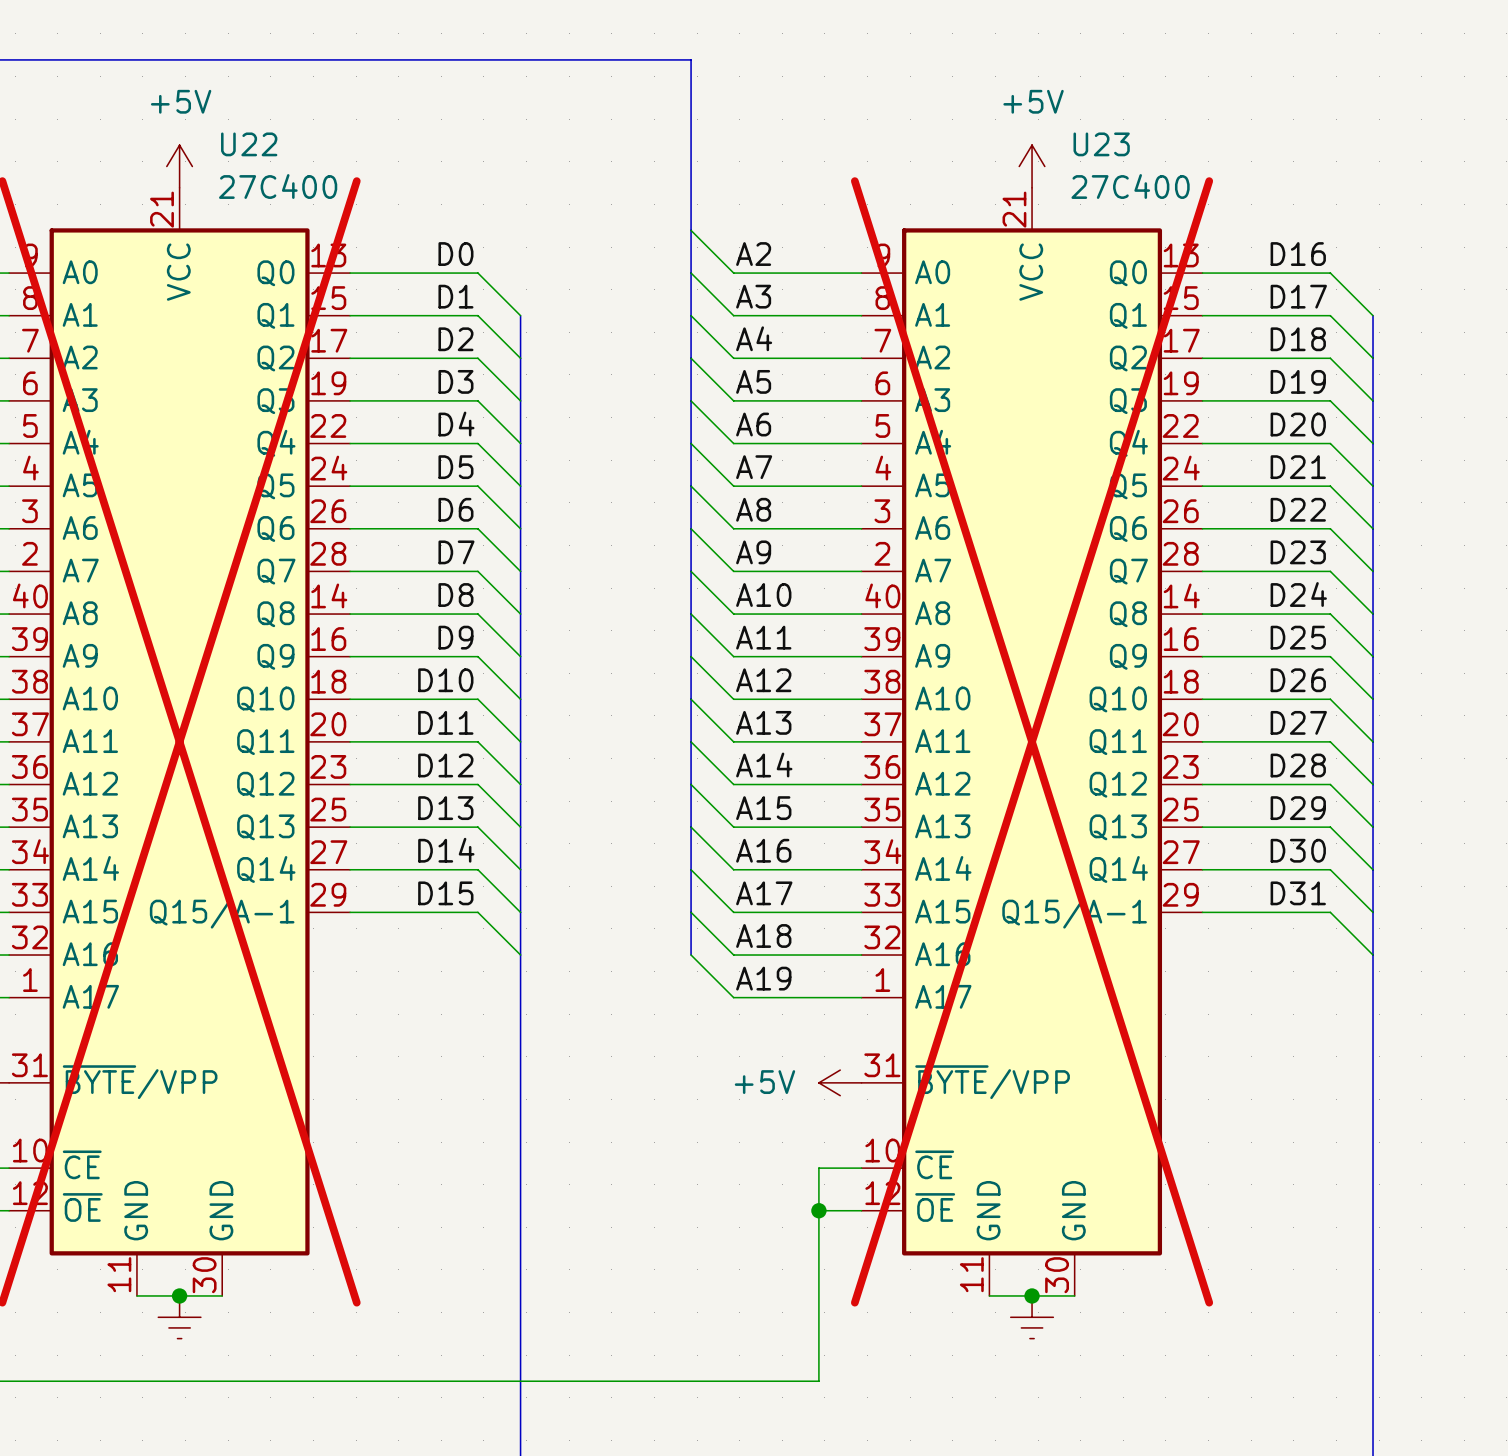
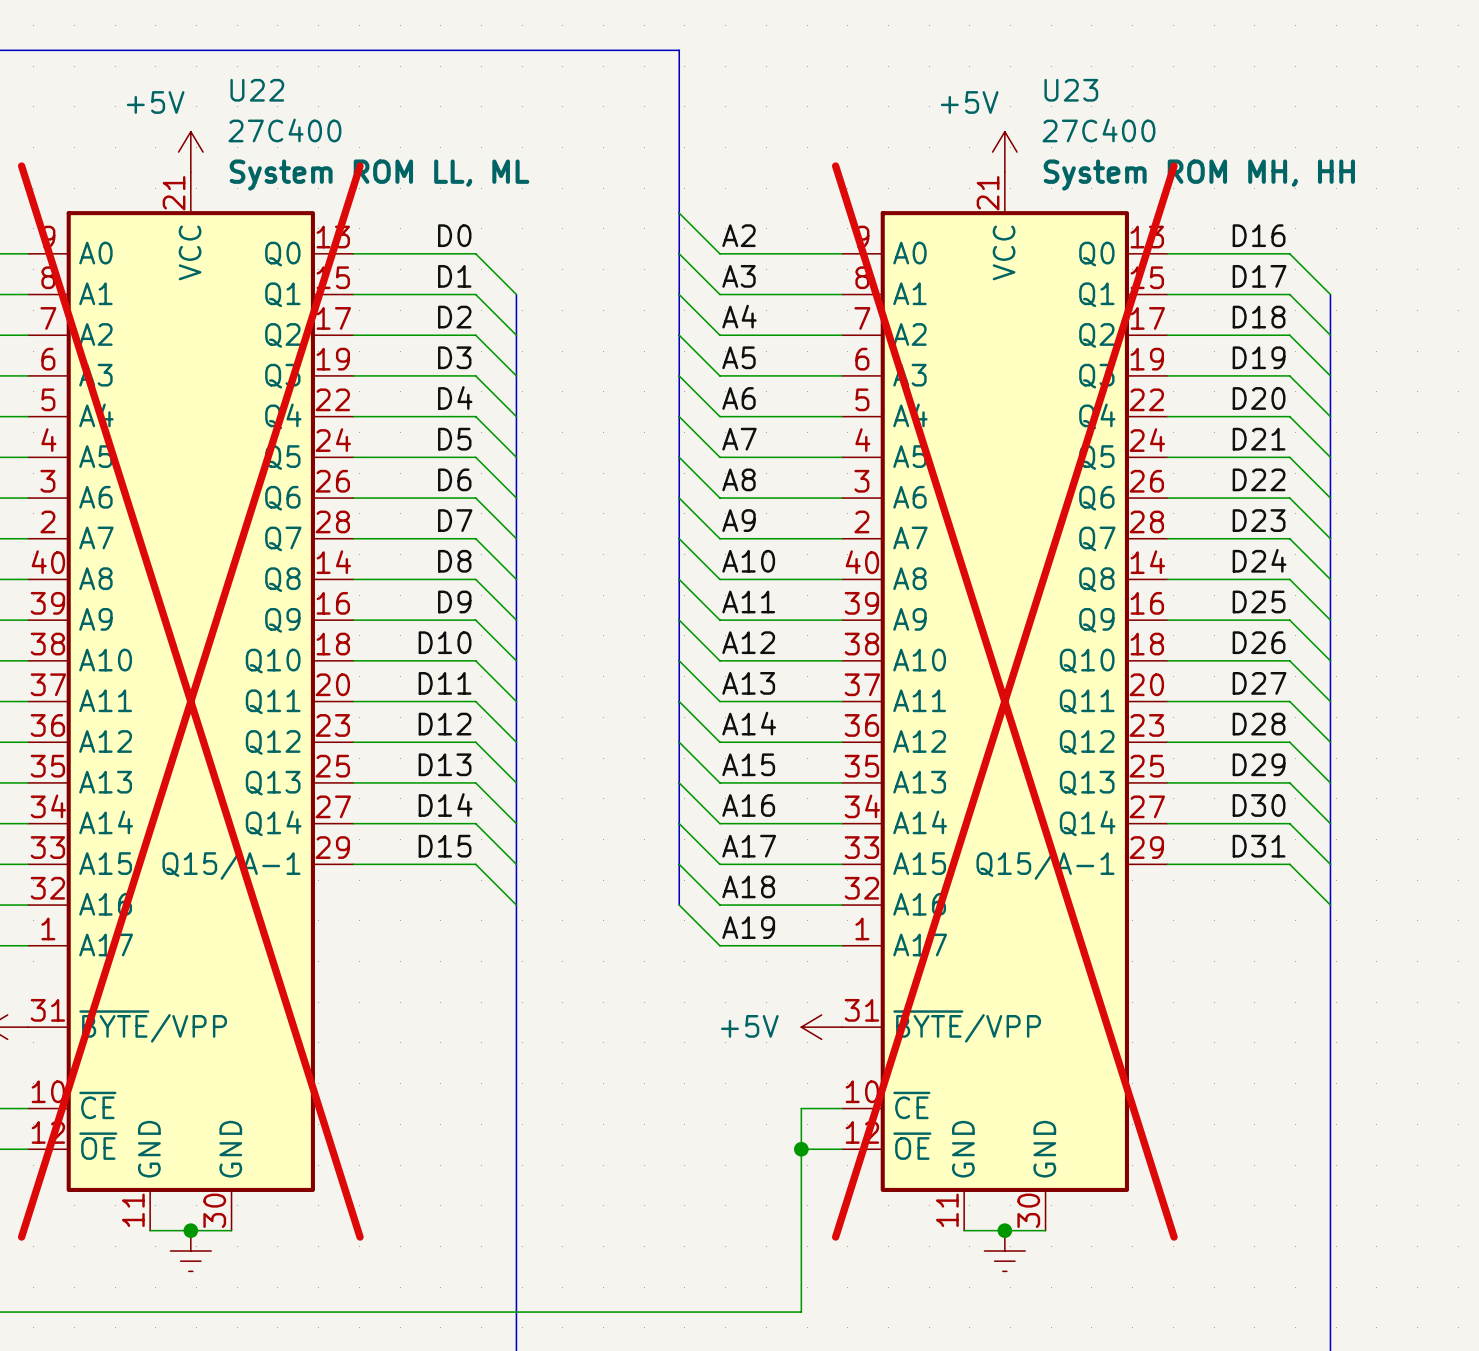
power symbol text position: +5V (181, 101) -> +5V (155, 102)
power symbol text position: +5V (1033, 101) -> +5V (969, 102)
U22 name position: U22 (249, 144) -> U22 (257, 90)
U23 name position: U23 (1101, 144) -> U23 (1071, 90)
U22 value position: 27C400 (278, 186) -> 27C400 (284, 130)
U23 value position: 27C400 (1130, 186) -> 27C400 (1098, 130)
U22 text: none -> System ROM LL, ML (379, 175)
U23 text: none -> System ROM MH, HH (1199, 175)

